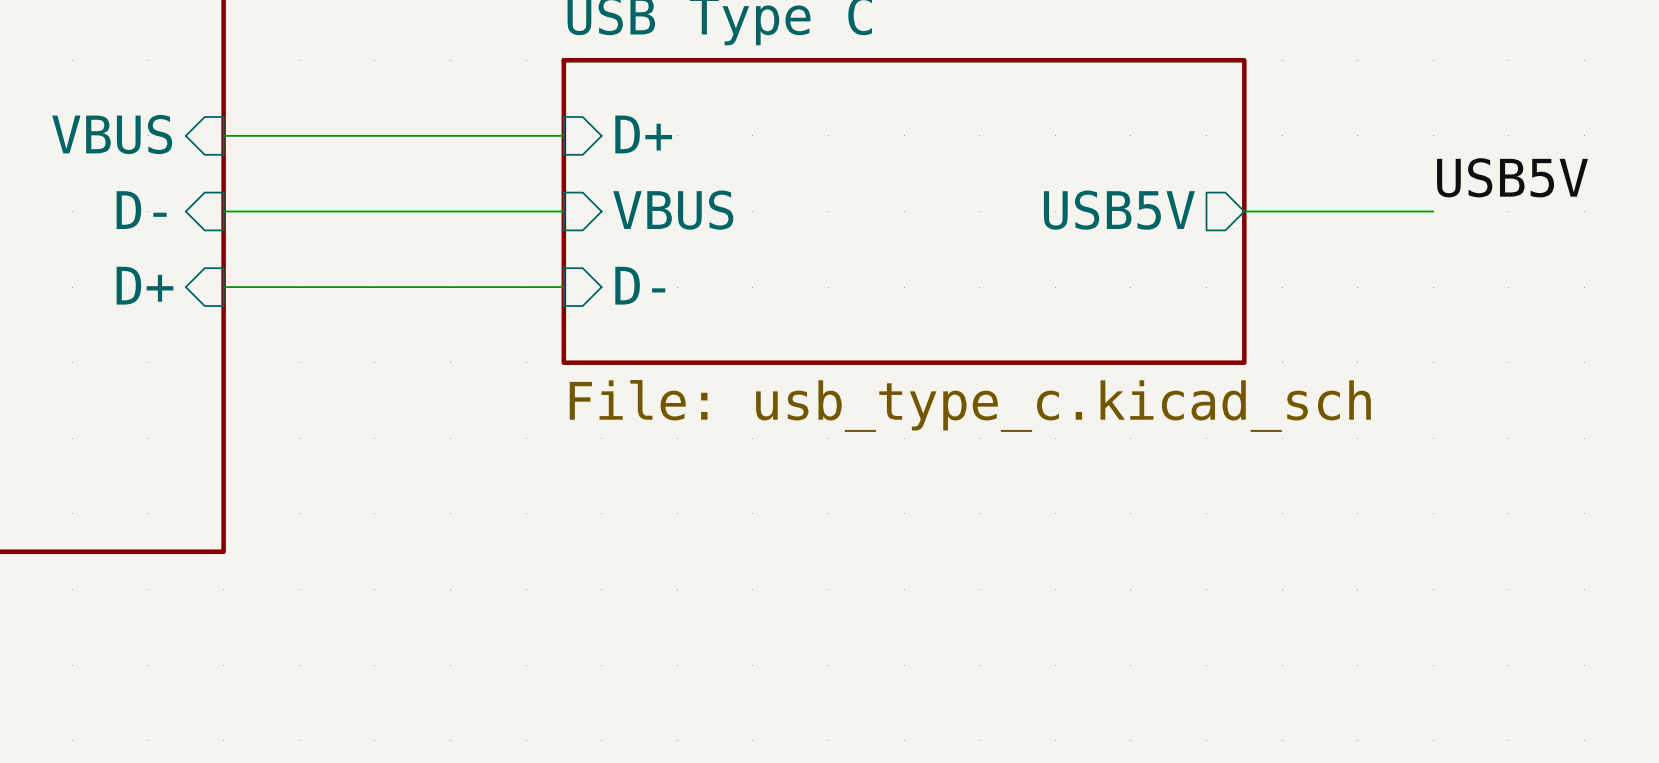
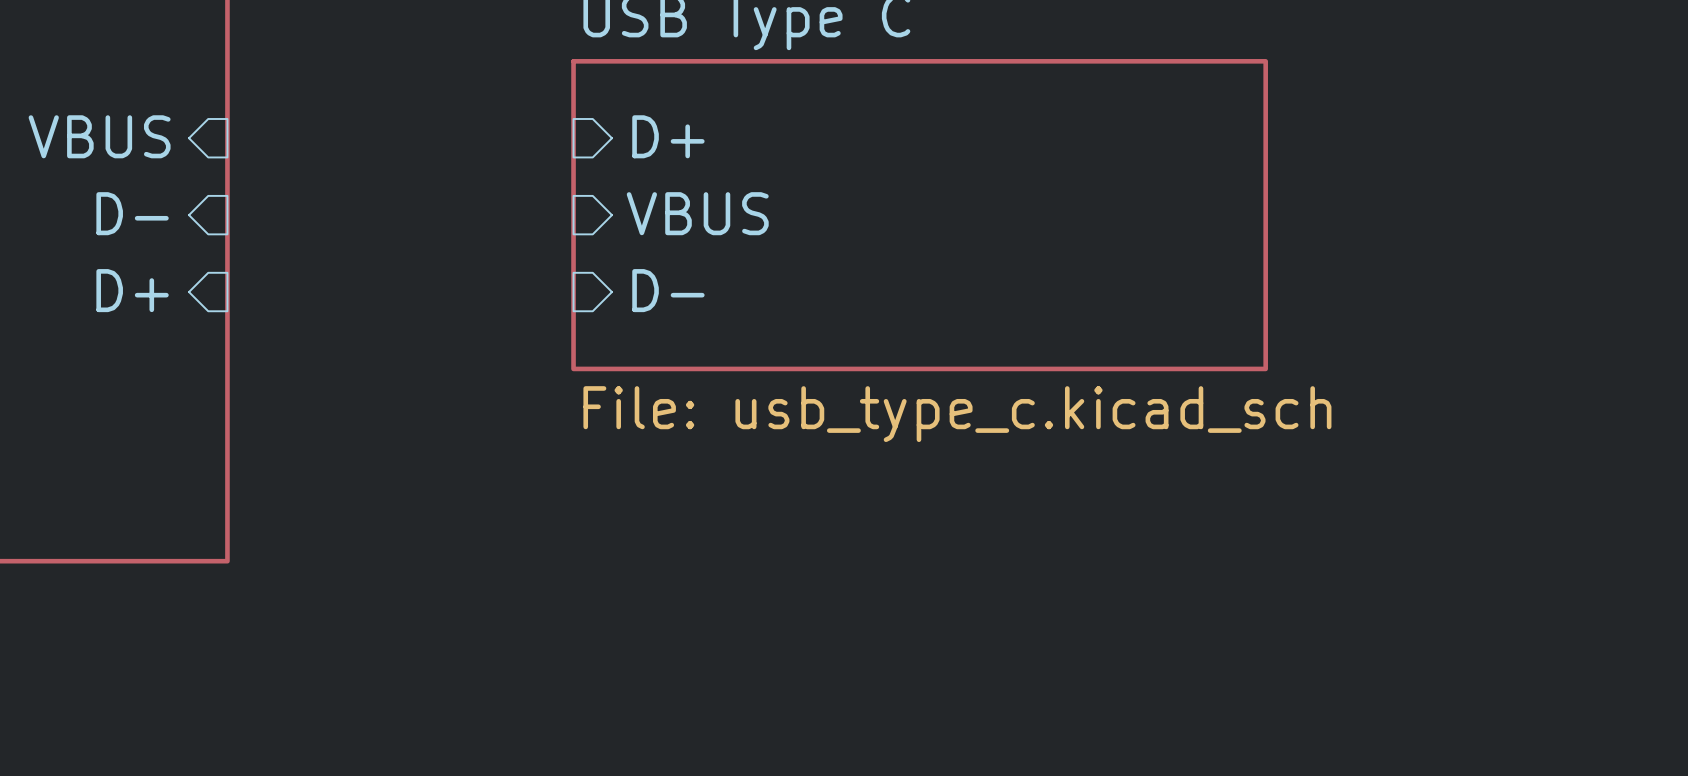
wire: (223, 135) (563, 135) -> none
label: USB5V (1512, 177) -> none
sheet pin: USB5V (1119, 210) -> none
wire: (223, 211) (563, 211) -> none
wire: (1244, 211) (1433, 211) -> none
wire: (223, 287) (563, 287) -> none

